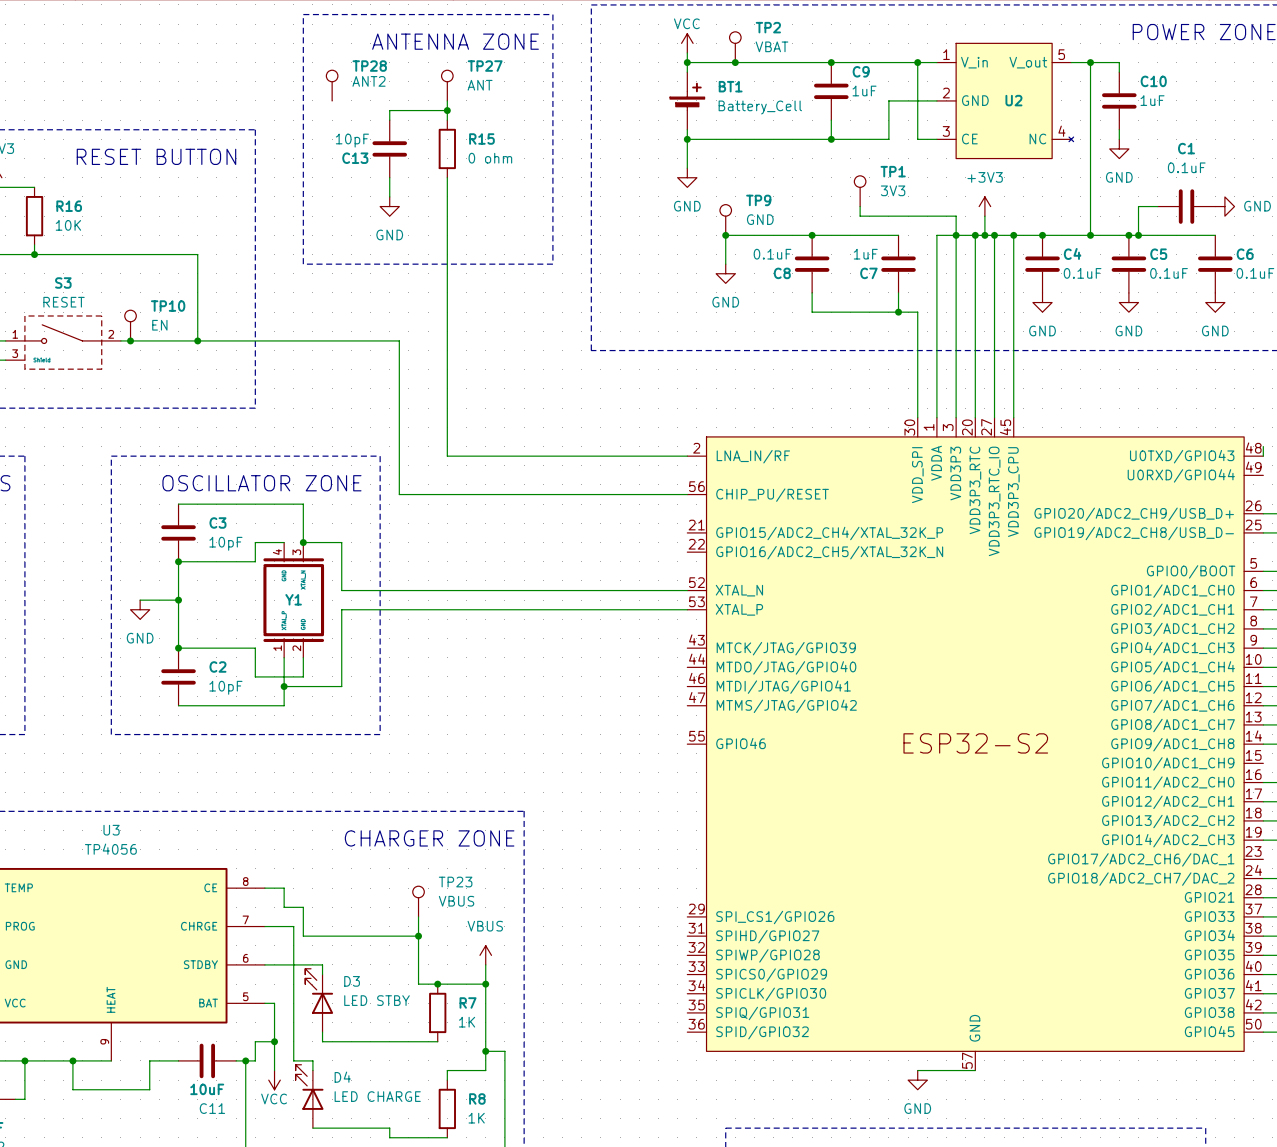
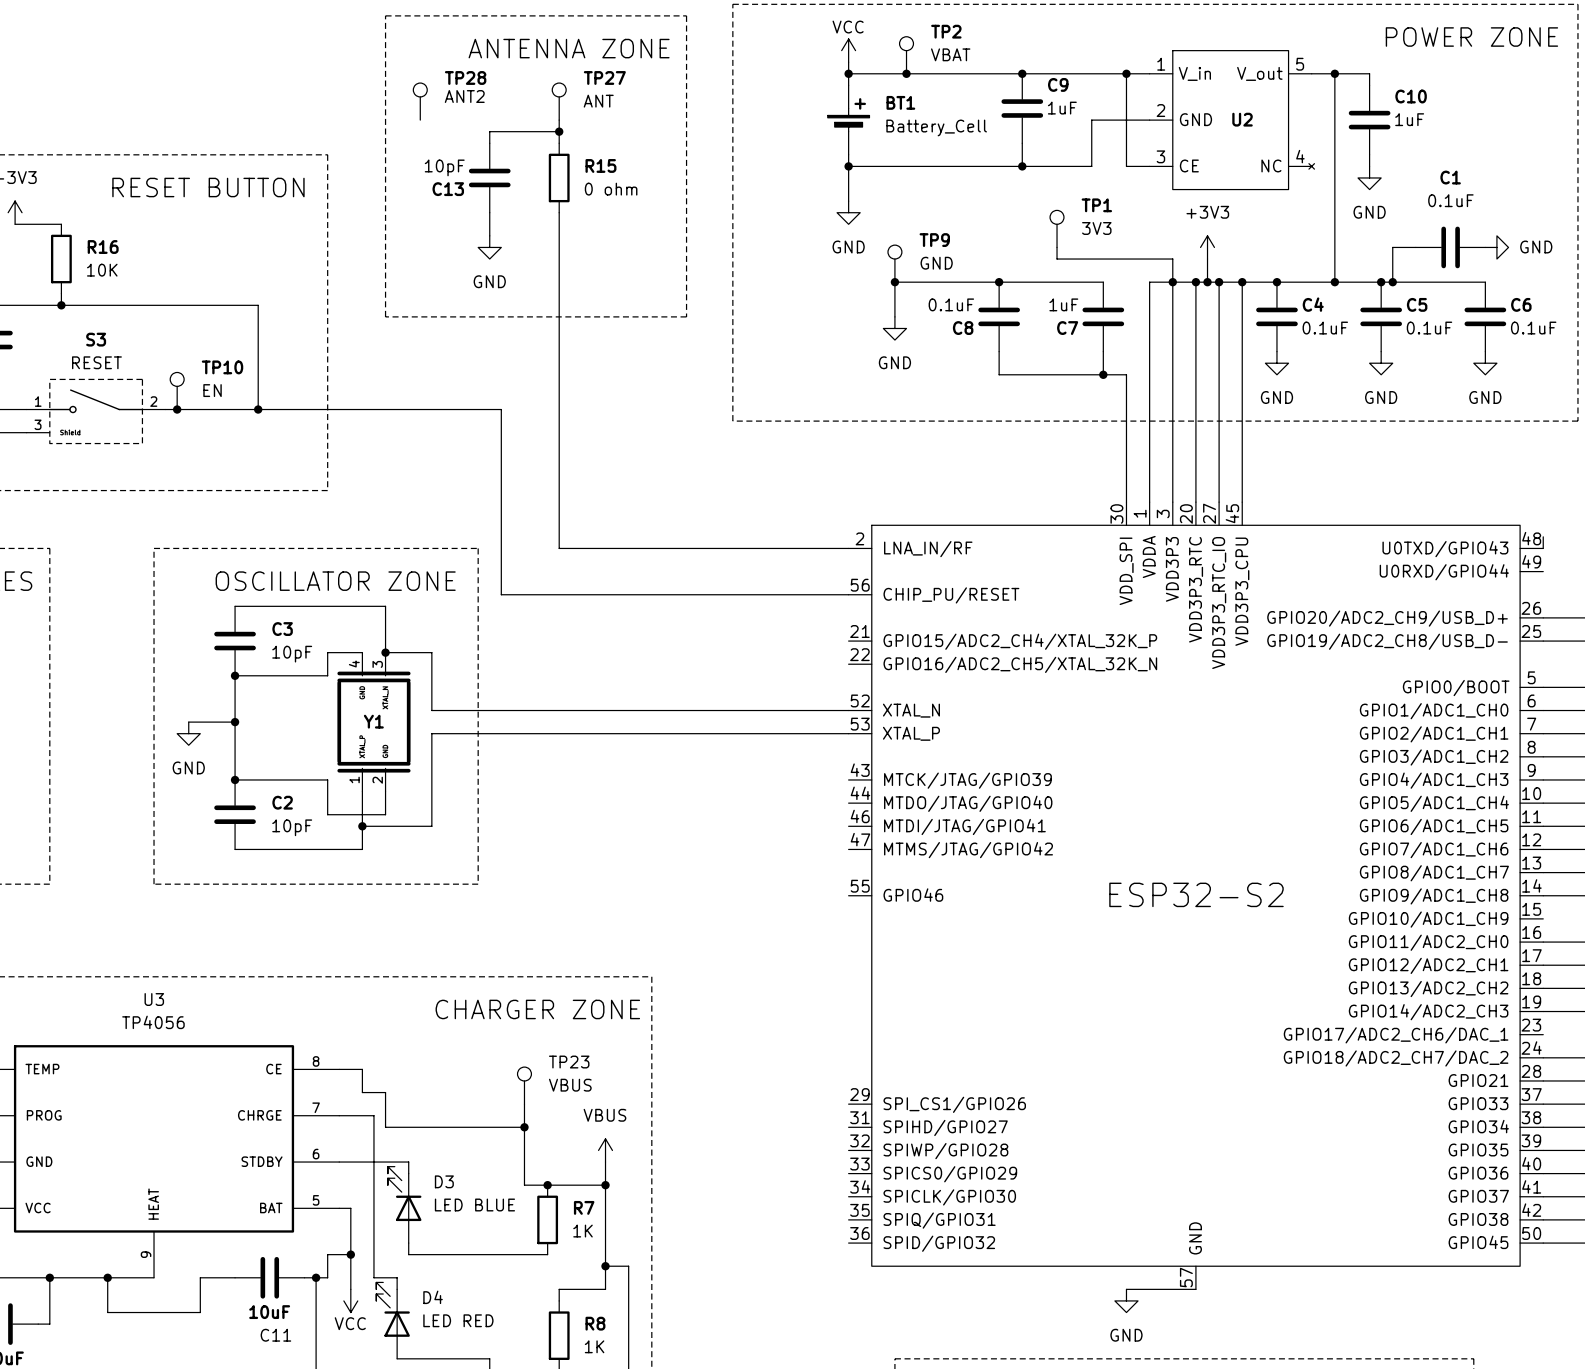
D3 value: LED STBY (377, 1000) -> LED BLUE (474, 1205)
D4 value: LED CHARGE (377, 1096) -> LED RED (458, 1320)

